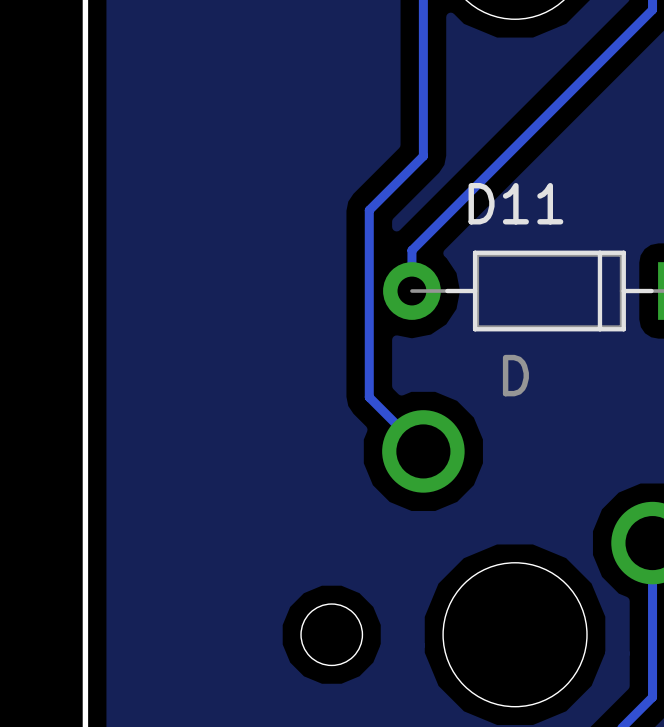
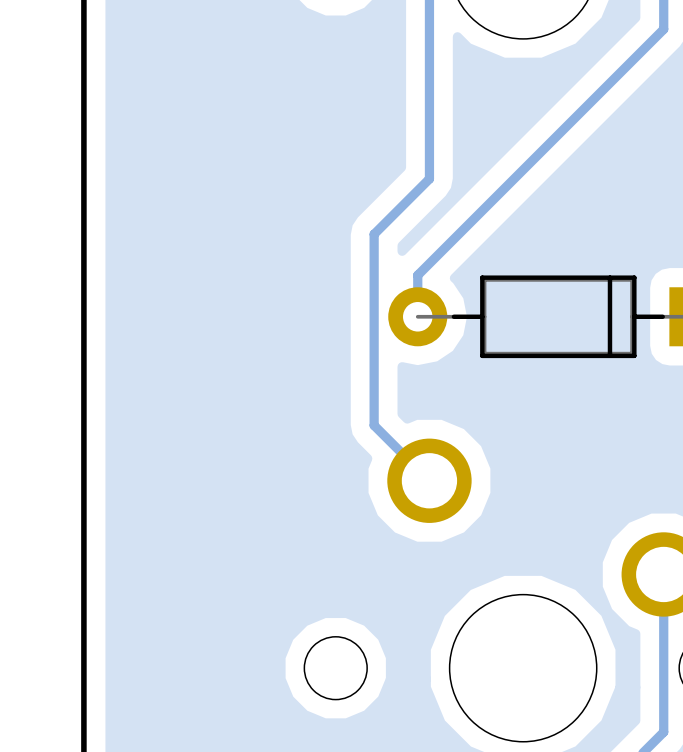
D11 name: D11 (515, 203) -> none
D11 value: D (515, 375) -> none

